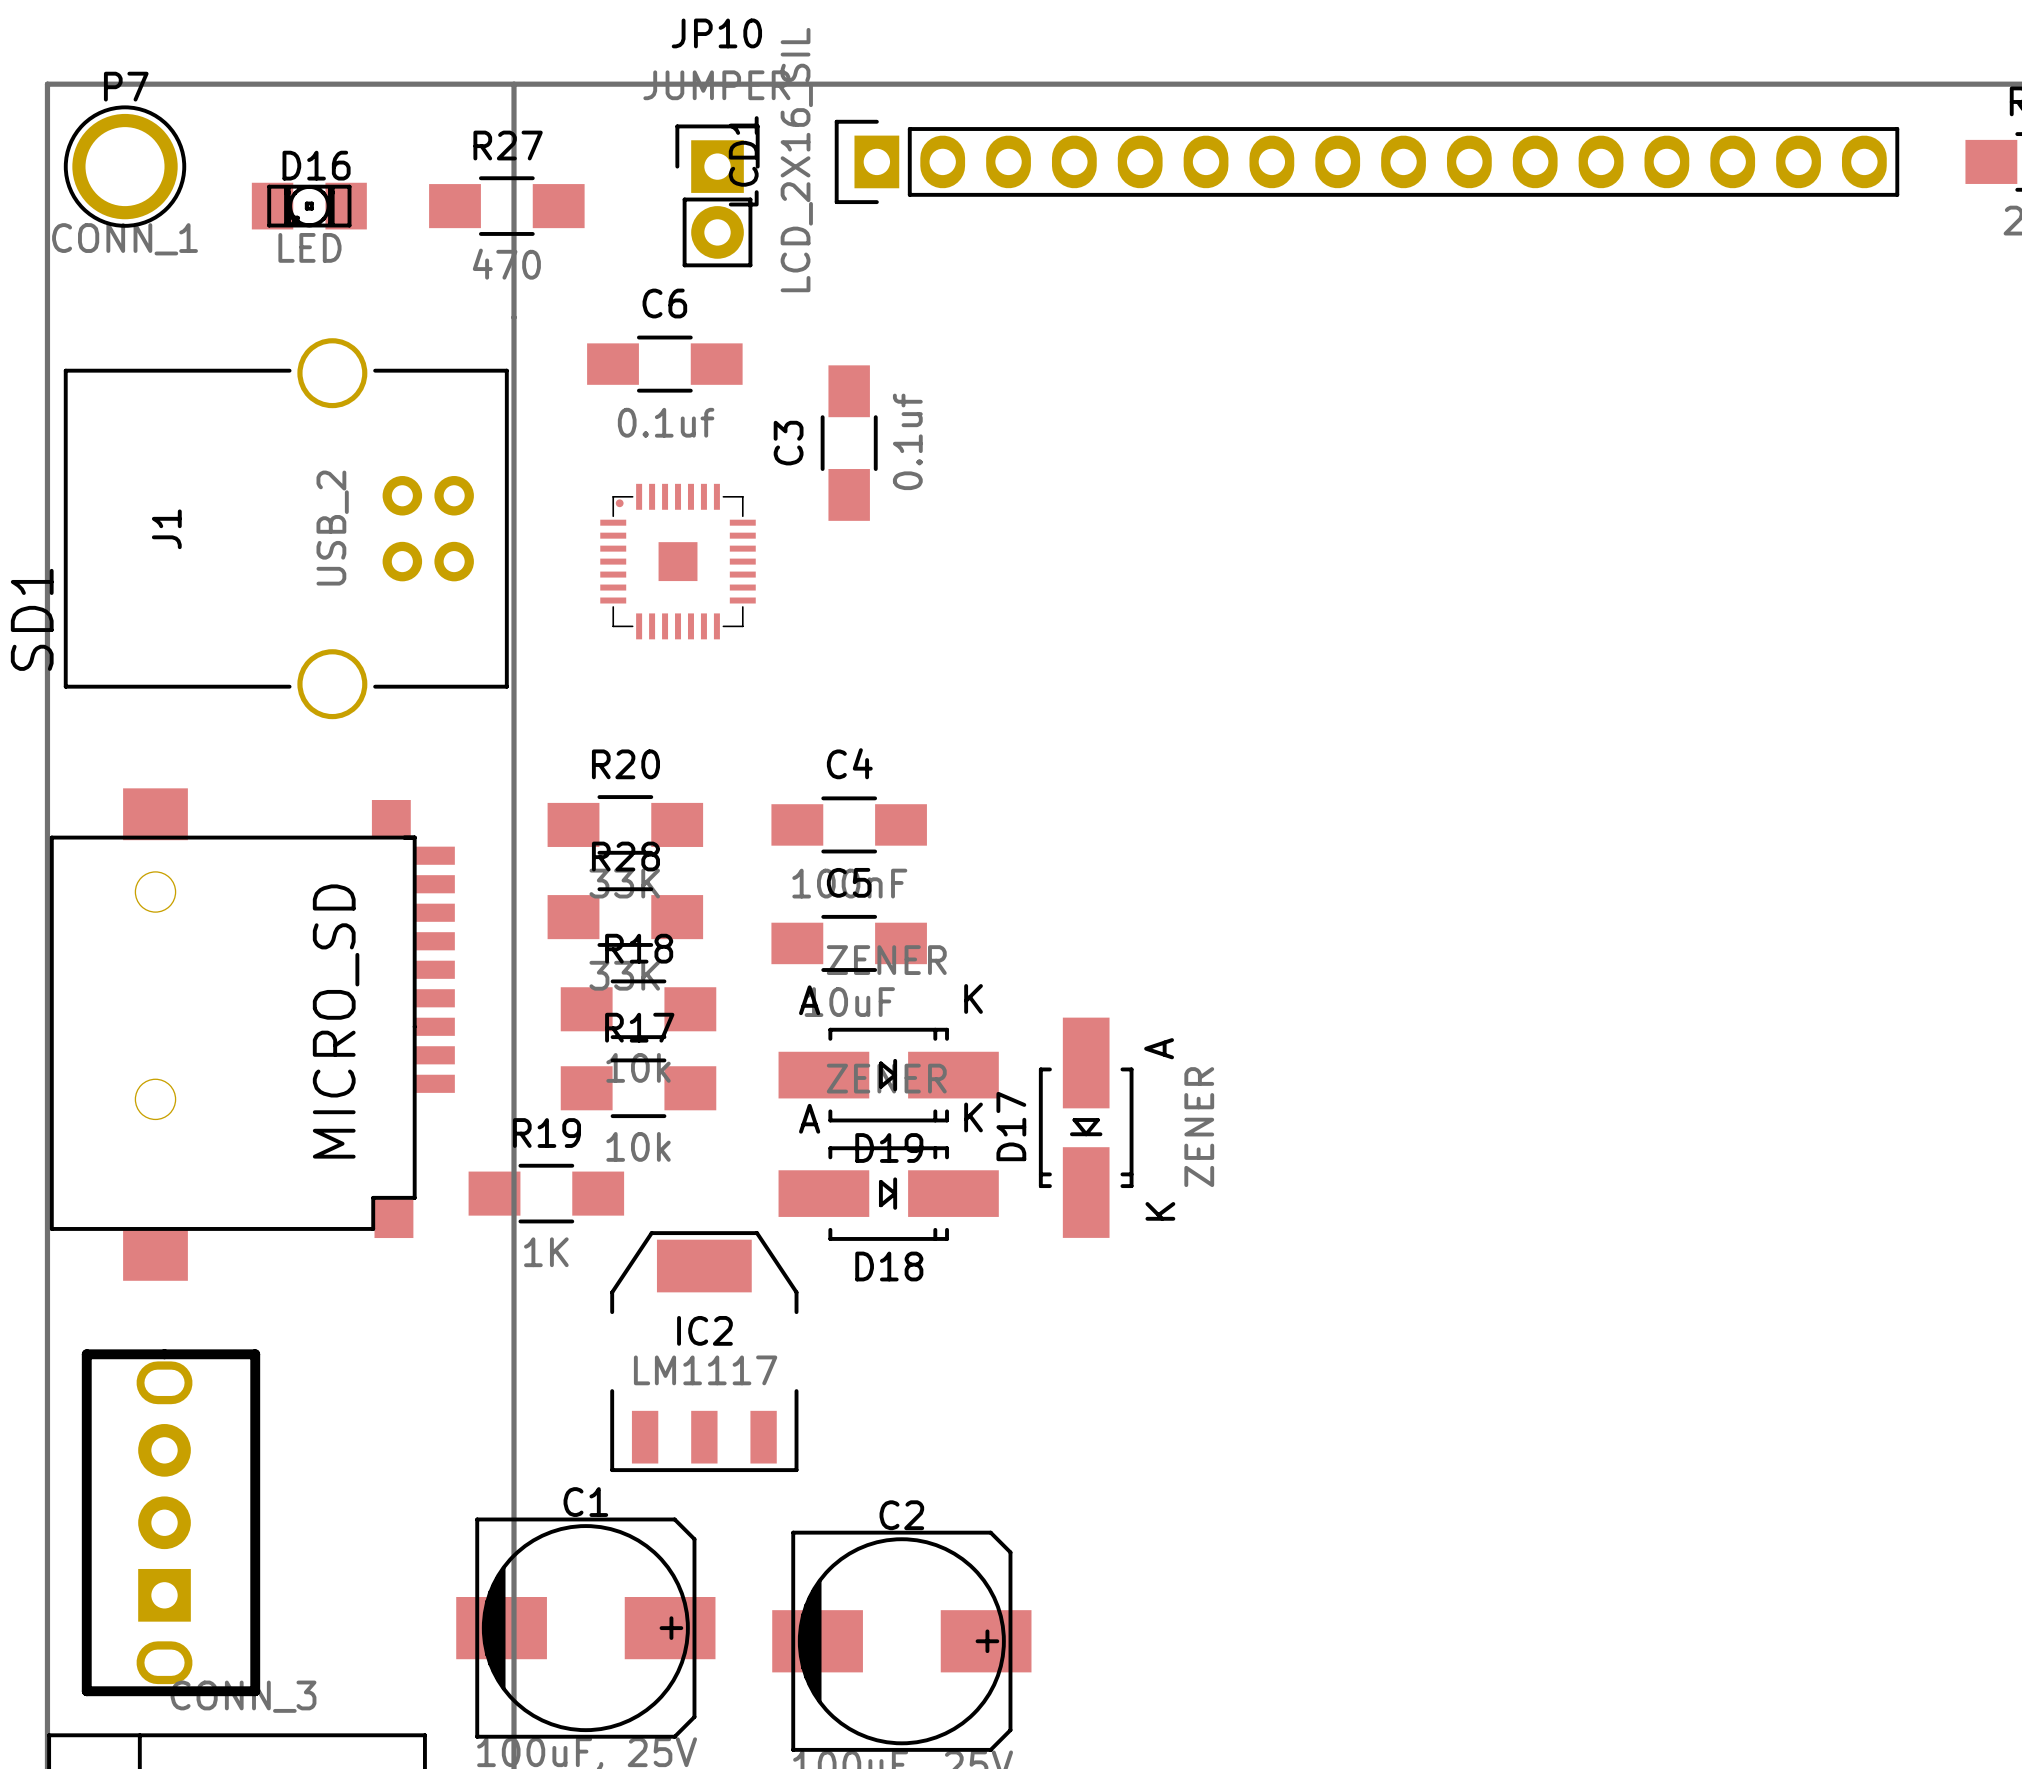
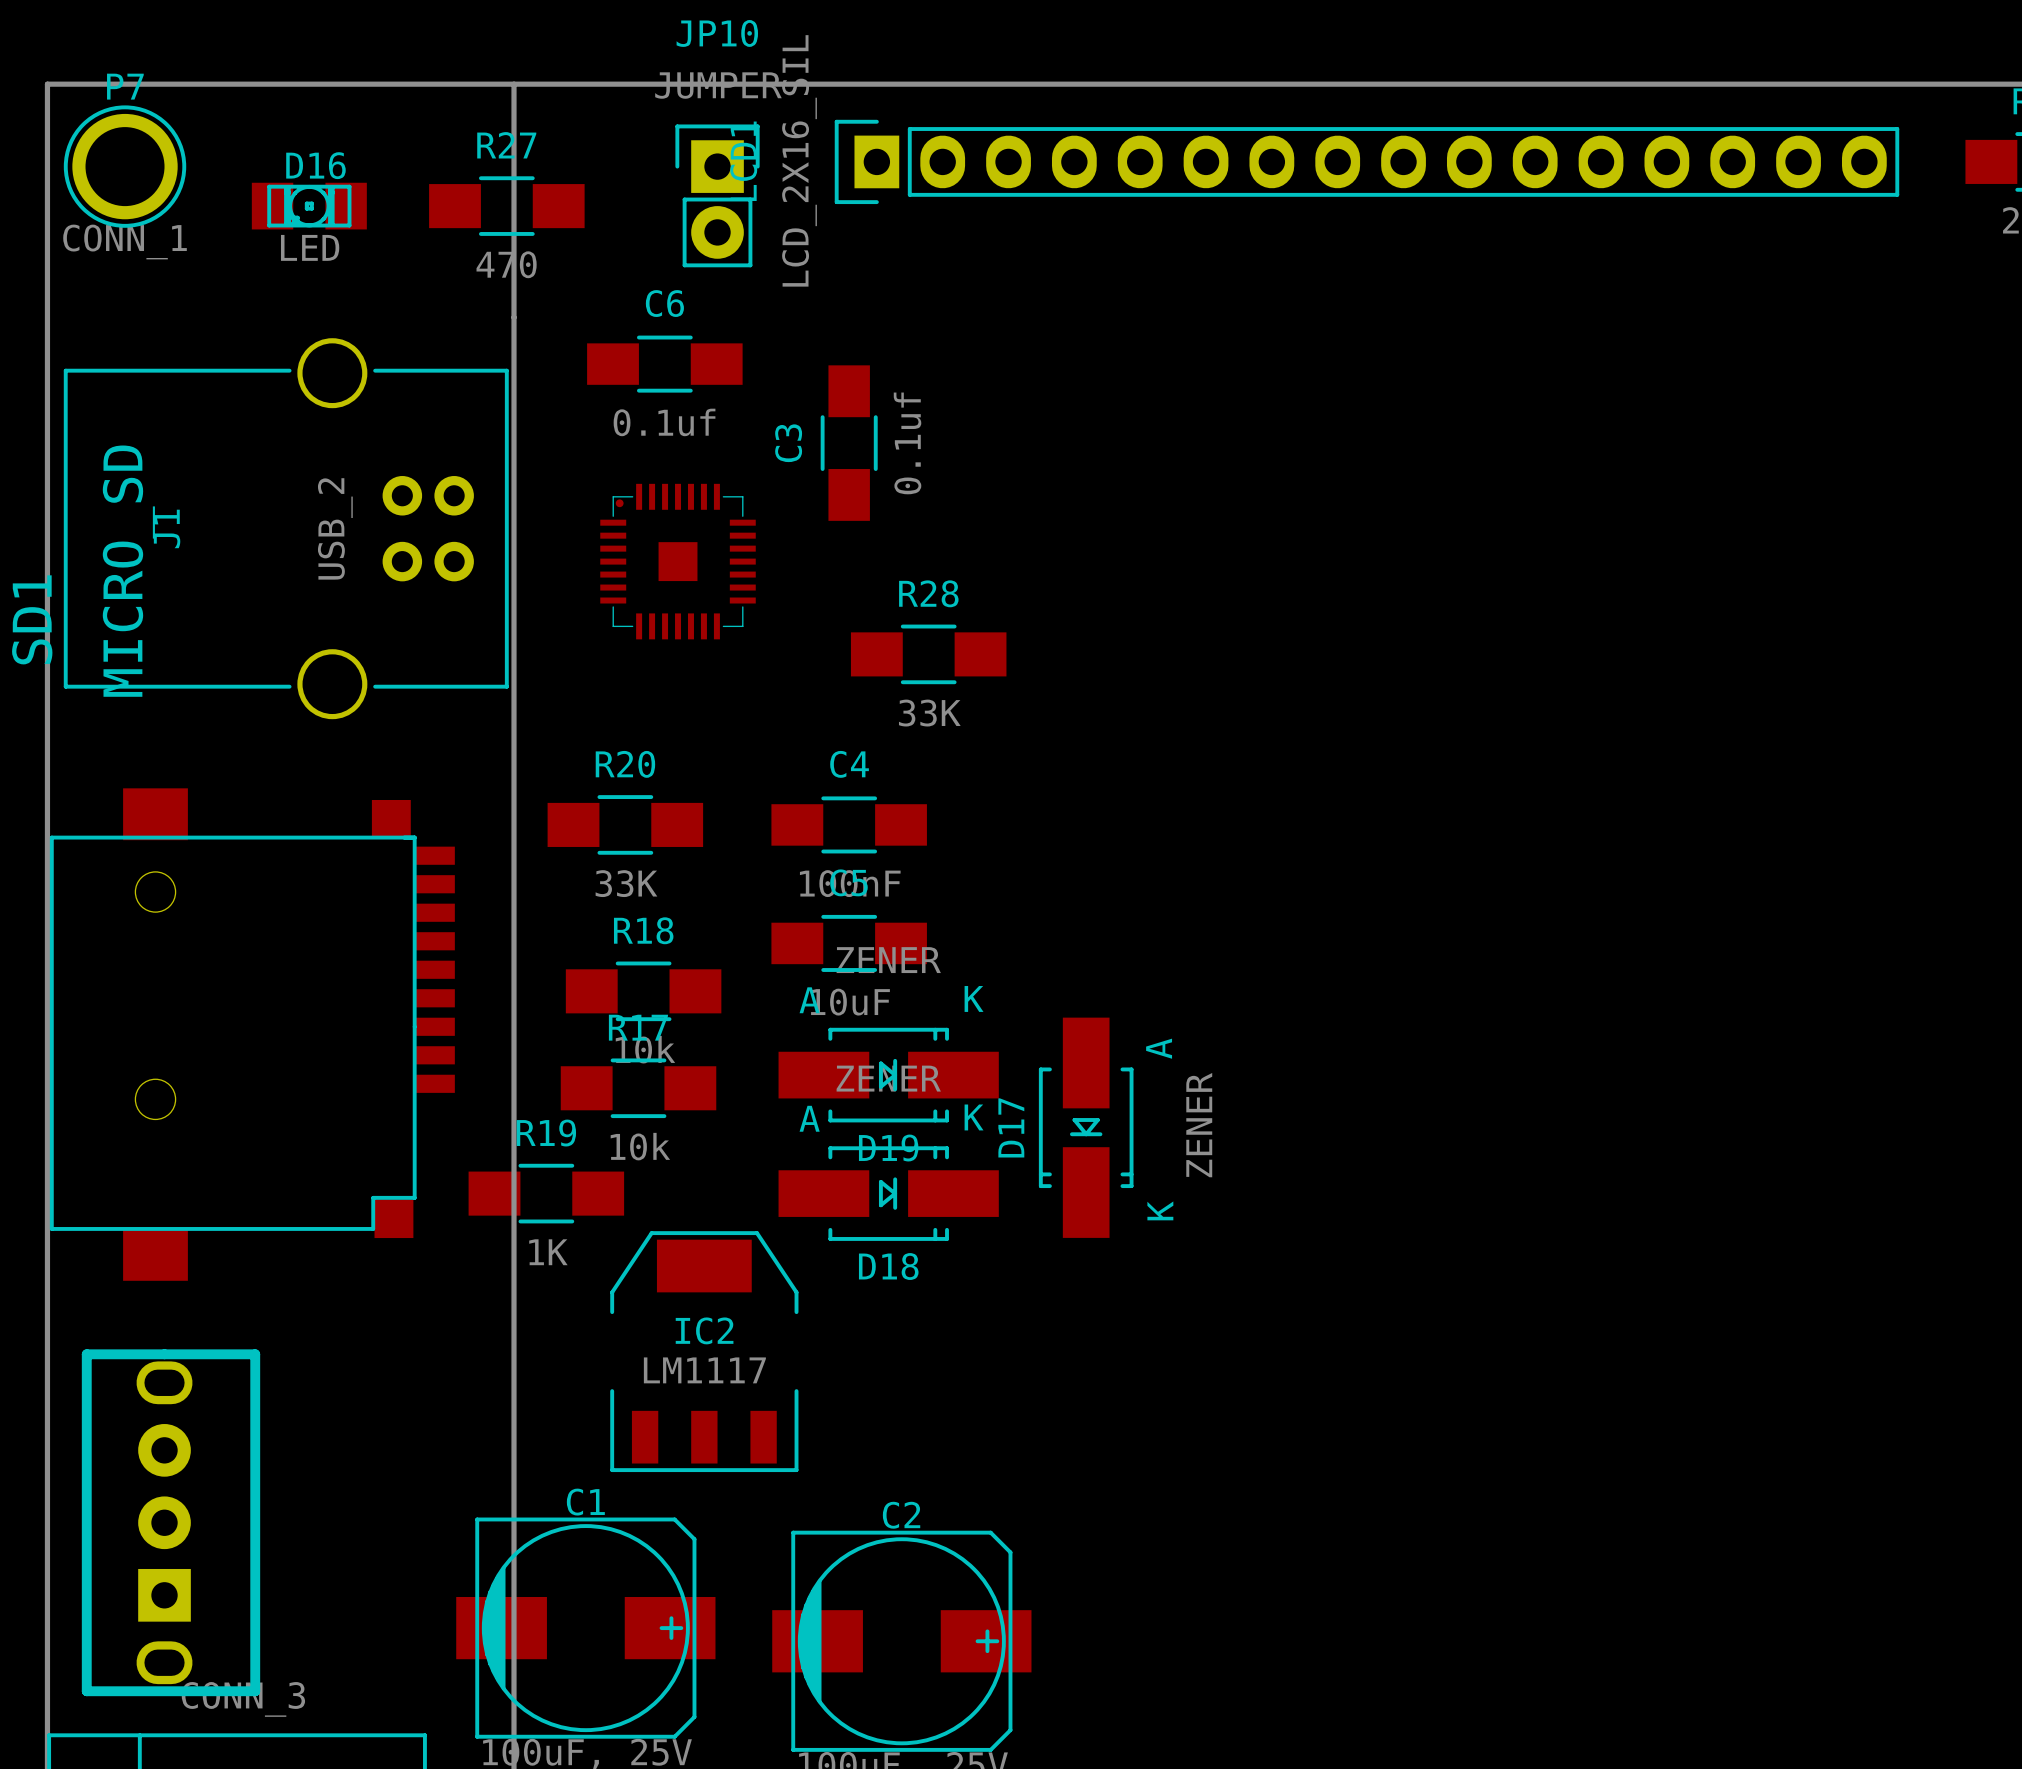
R28 position: (625, 917) -> (928, 654)
R18 position: (638, 1009) -> (643, 991)
SD1 value position: MICRO_SD (336, 1021) -> MICRO_SD (128, 571)

